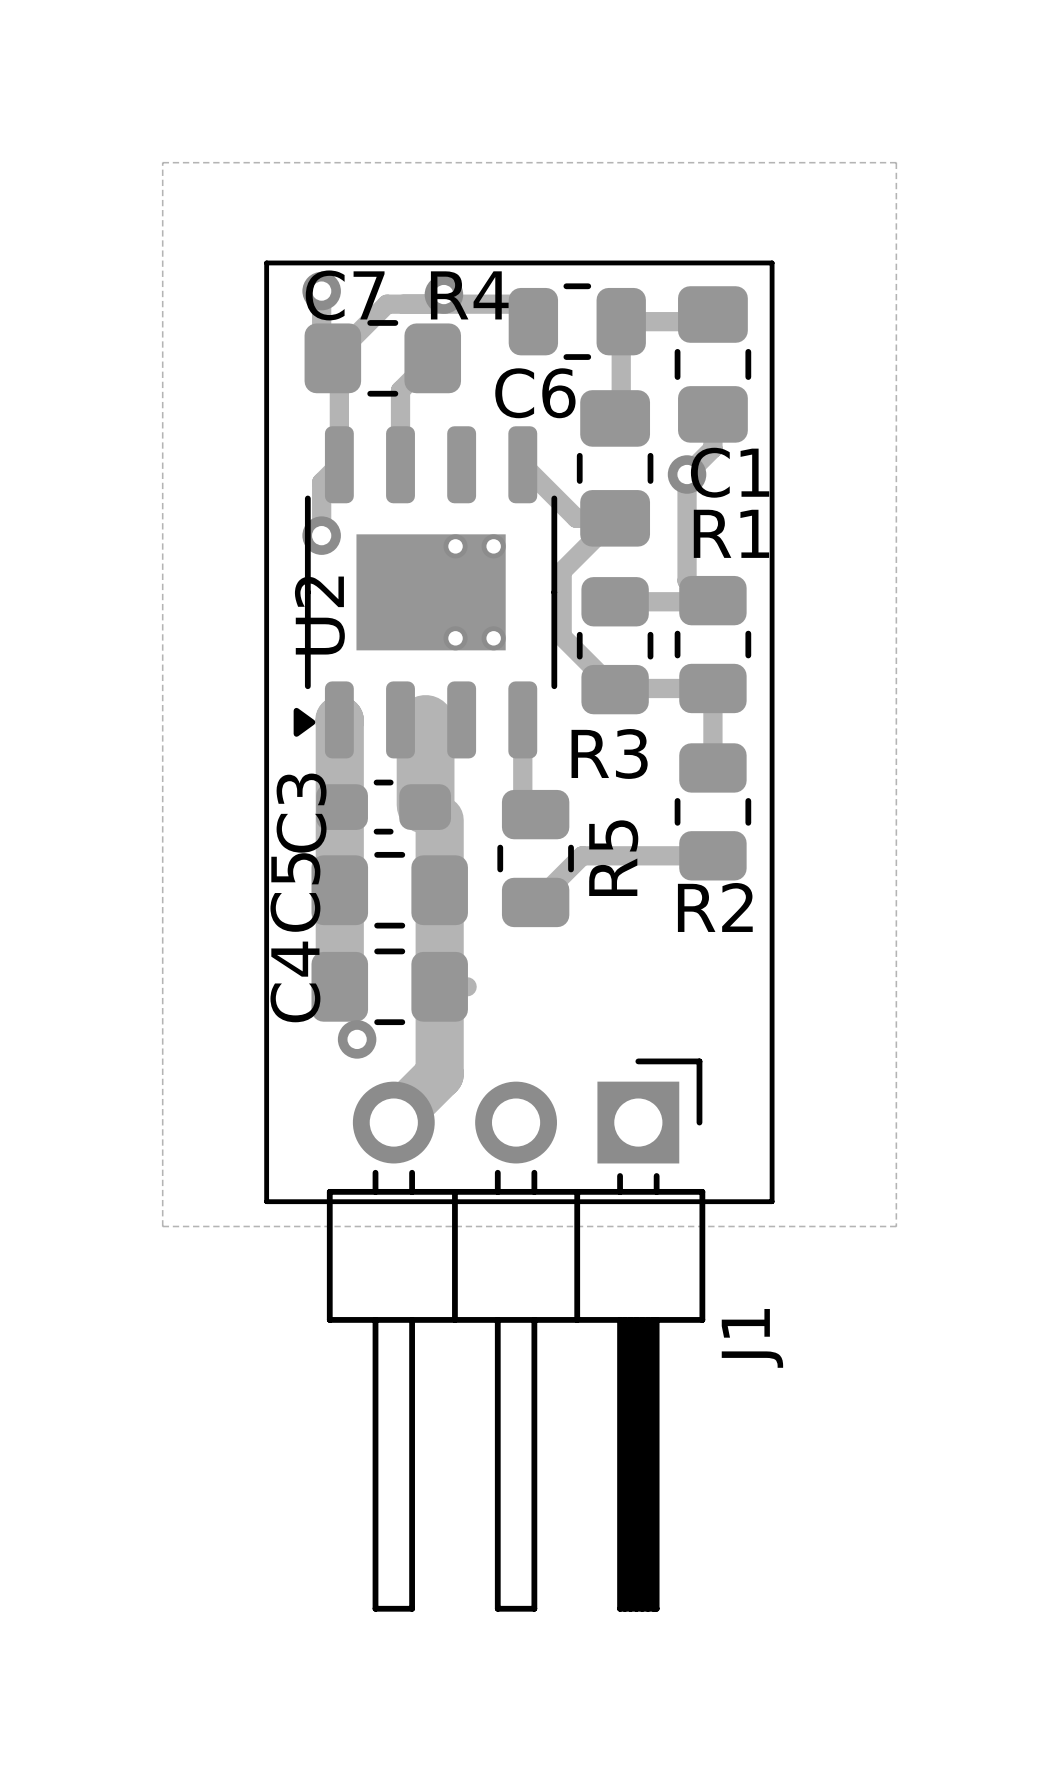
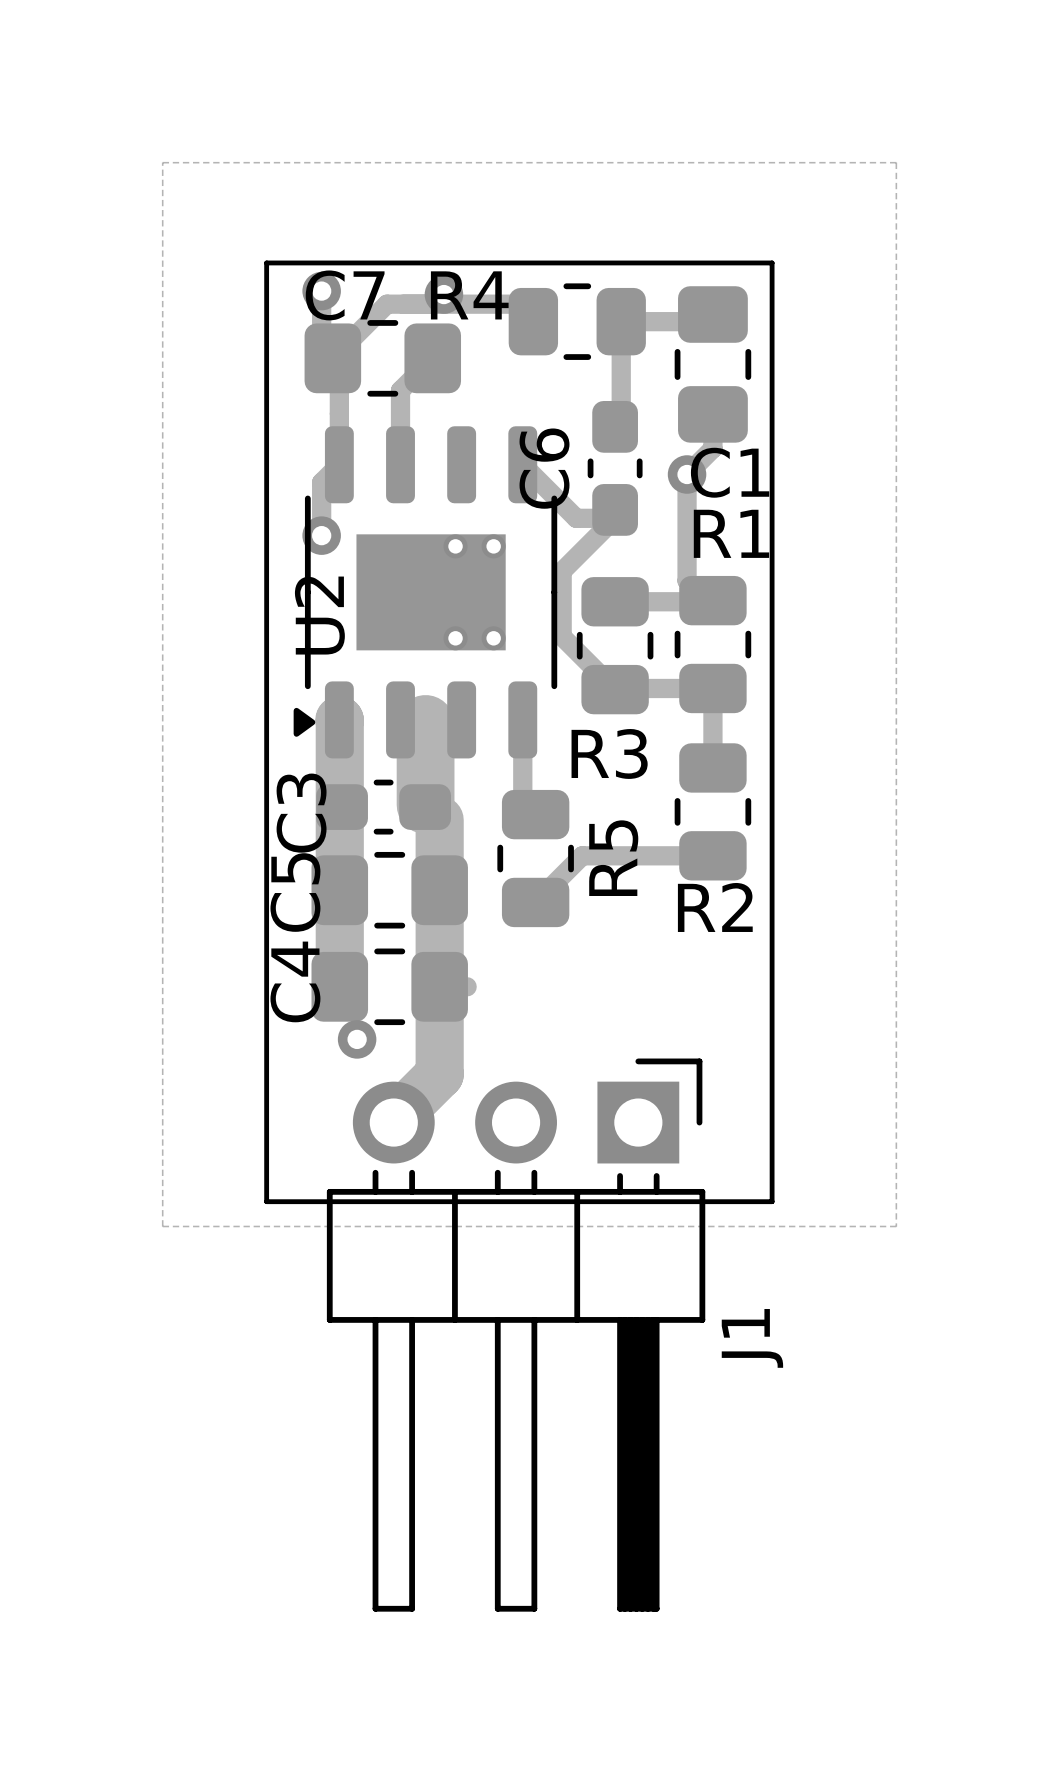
C6 footprint: [576, 390, 654, 547] -> [587, 400, 643, 536]
C6 name rotation: 0° (535, 393) -> 90° counterclockwise (544, 468)

